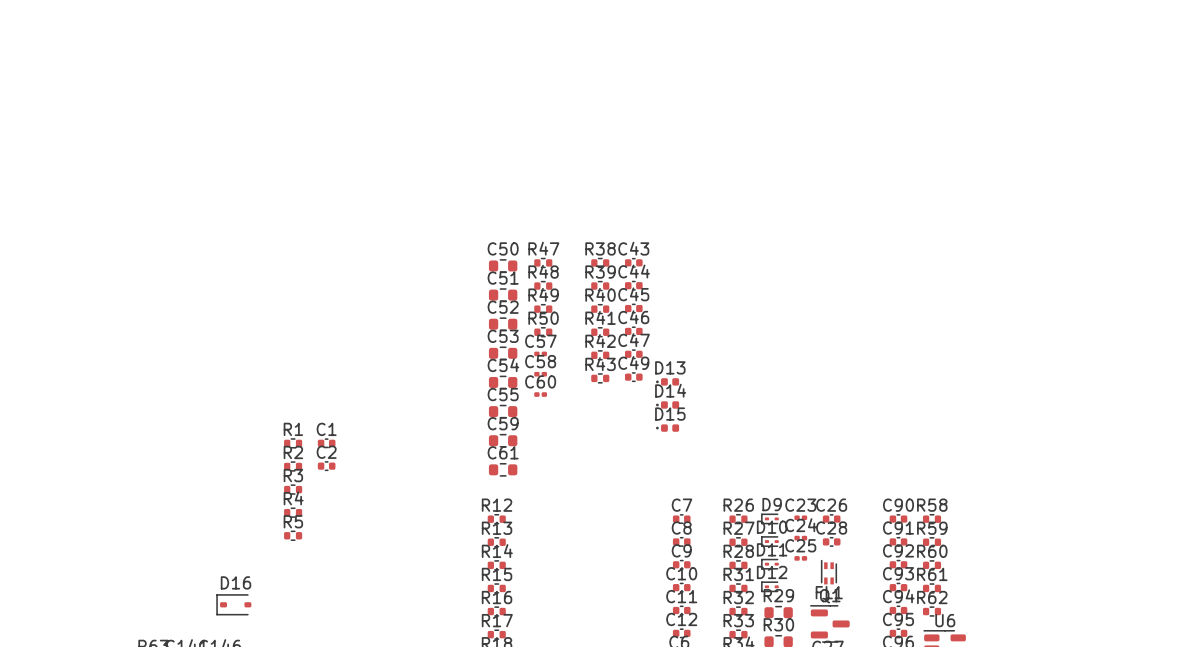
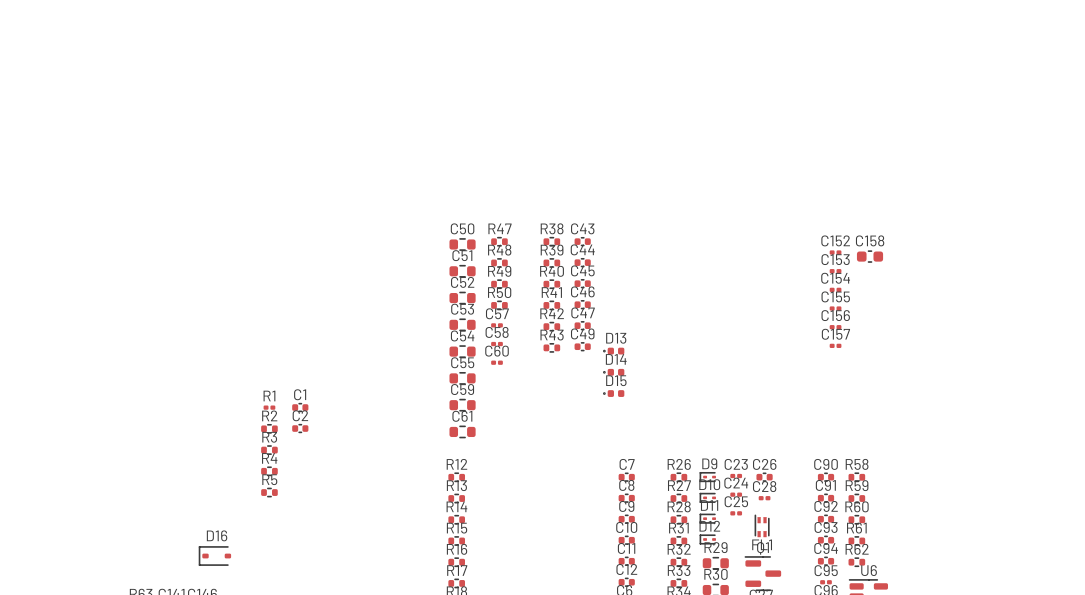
C152: none -> (835, 252)
C158: none -> (870, 256)
C153: none -> (835, 271)
C154: none -> (835, 289)
C155: none -> (835, 308)
C156: none -> (835, 327)
C157: none -> (835, 345)
R1 footprint: [284, 438, 303, 449] -> [263, 405, 276, 410]
C28 footprint: [822, 537, 841, 547] -> [758, 496, 771, 501]
C95 footprint: [889, 628, 908, 639] -> [820, 580, 832, 585]

